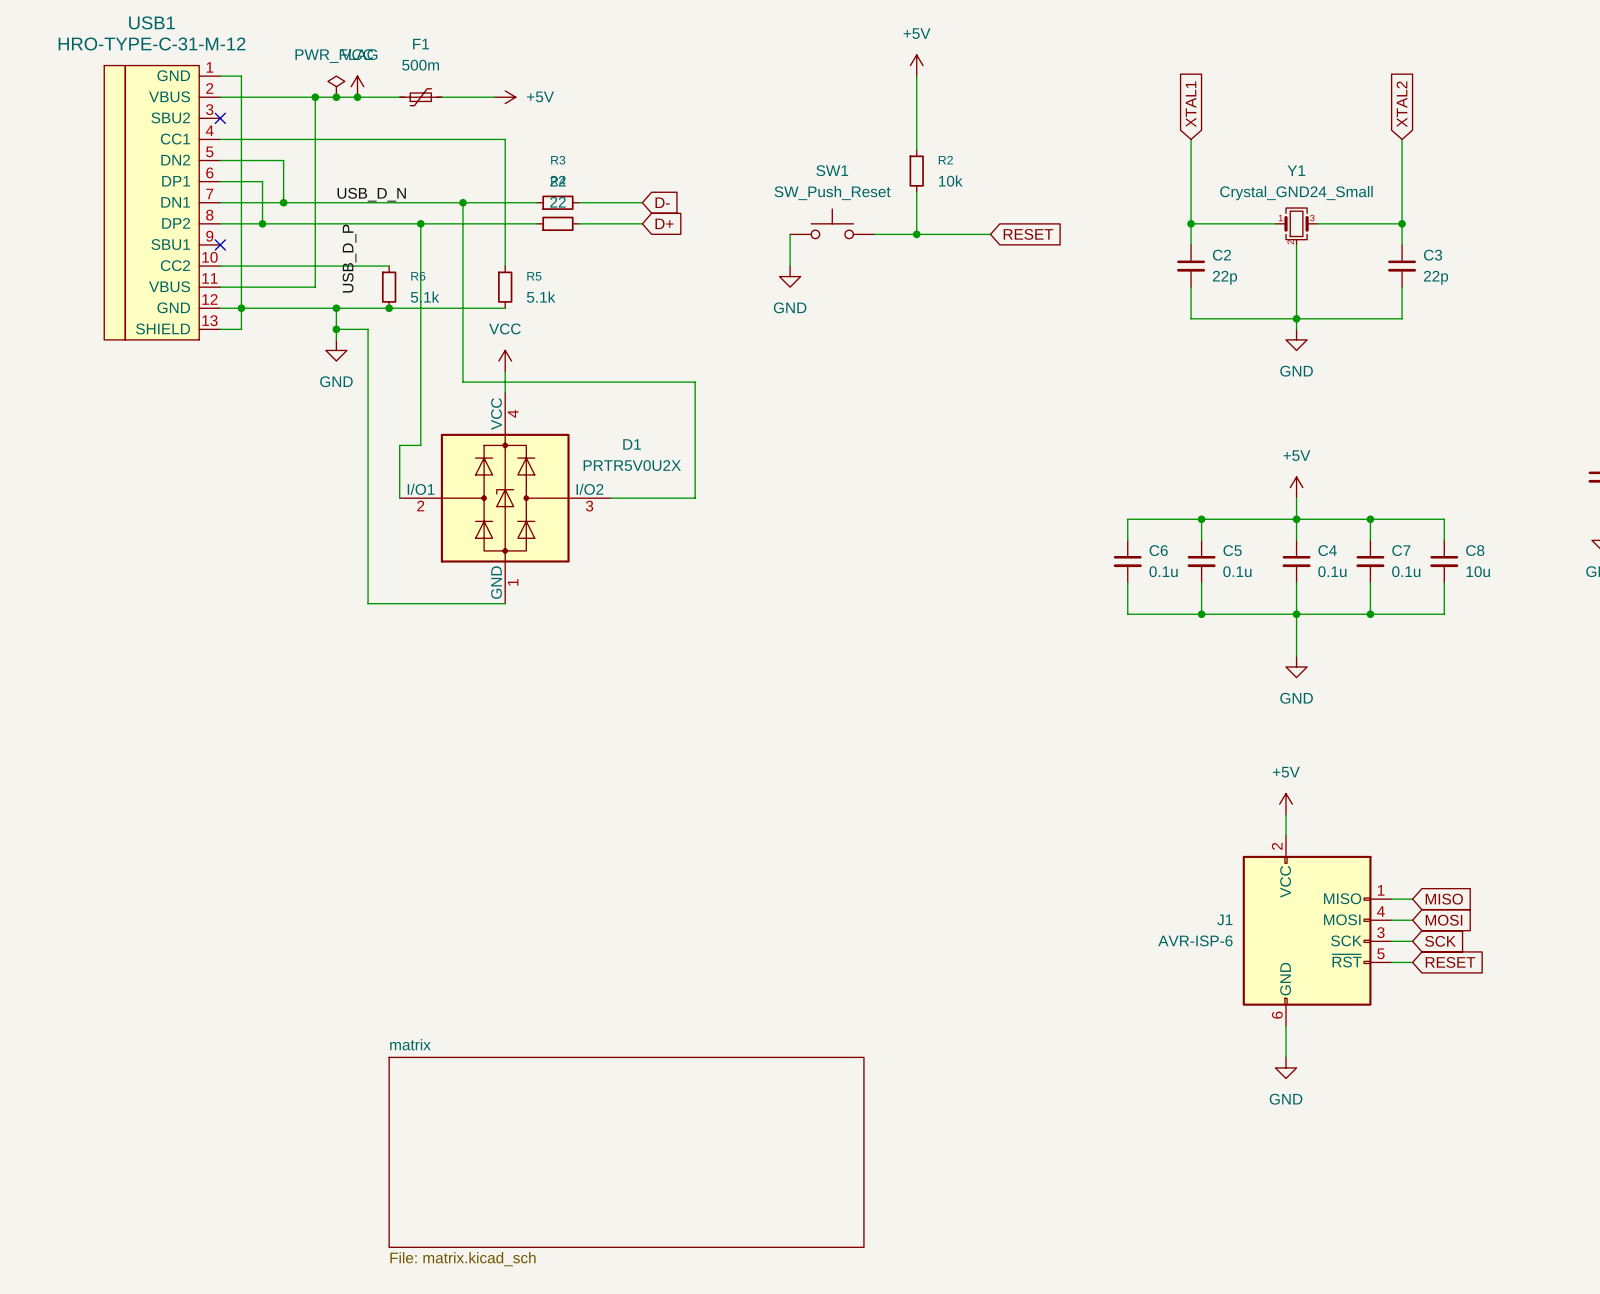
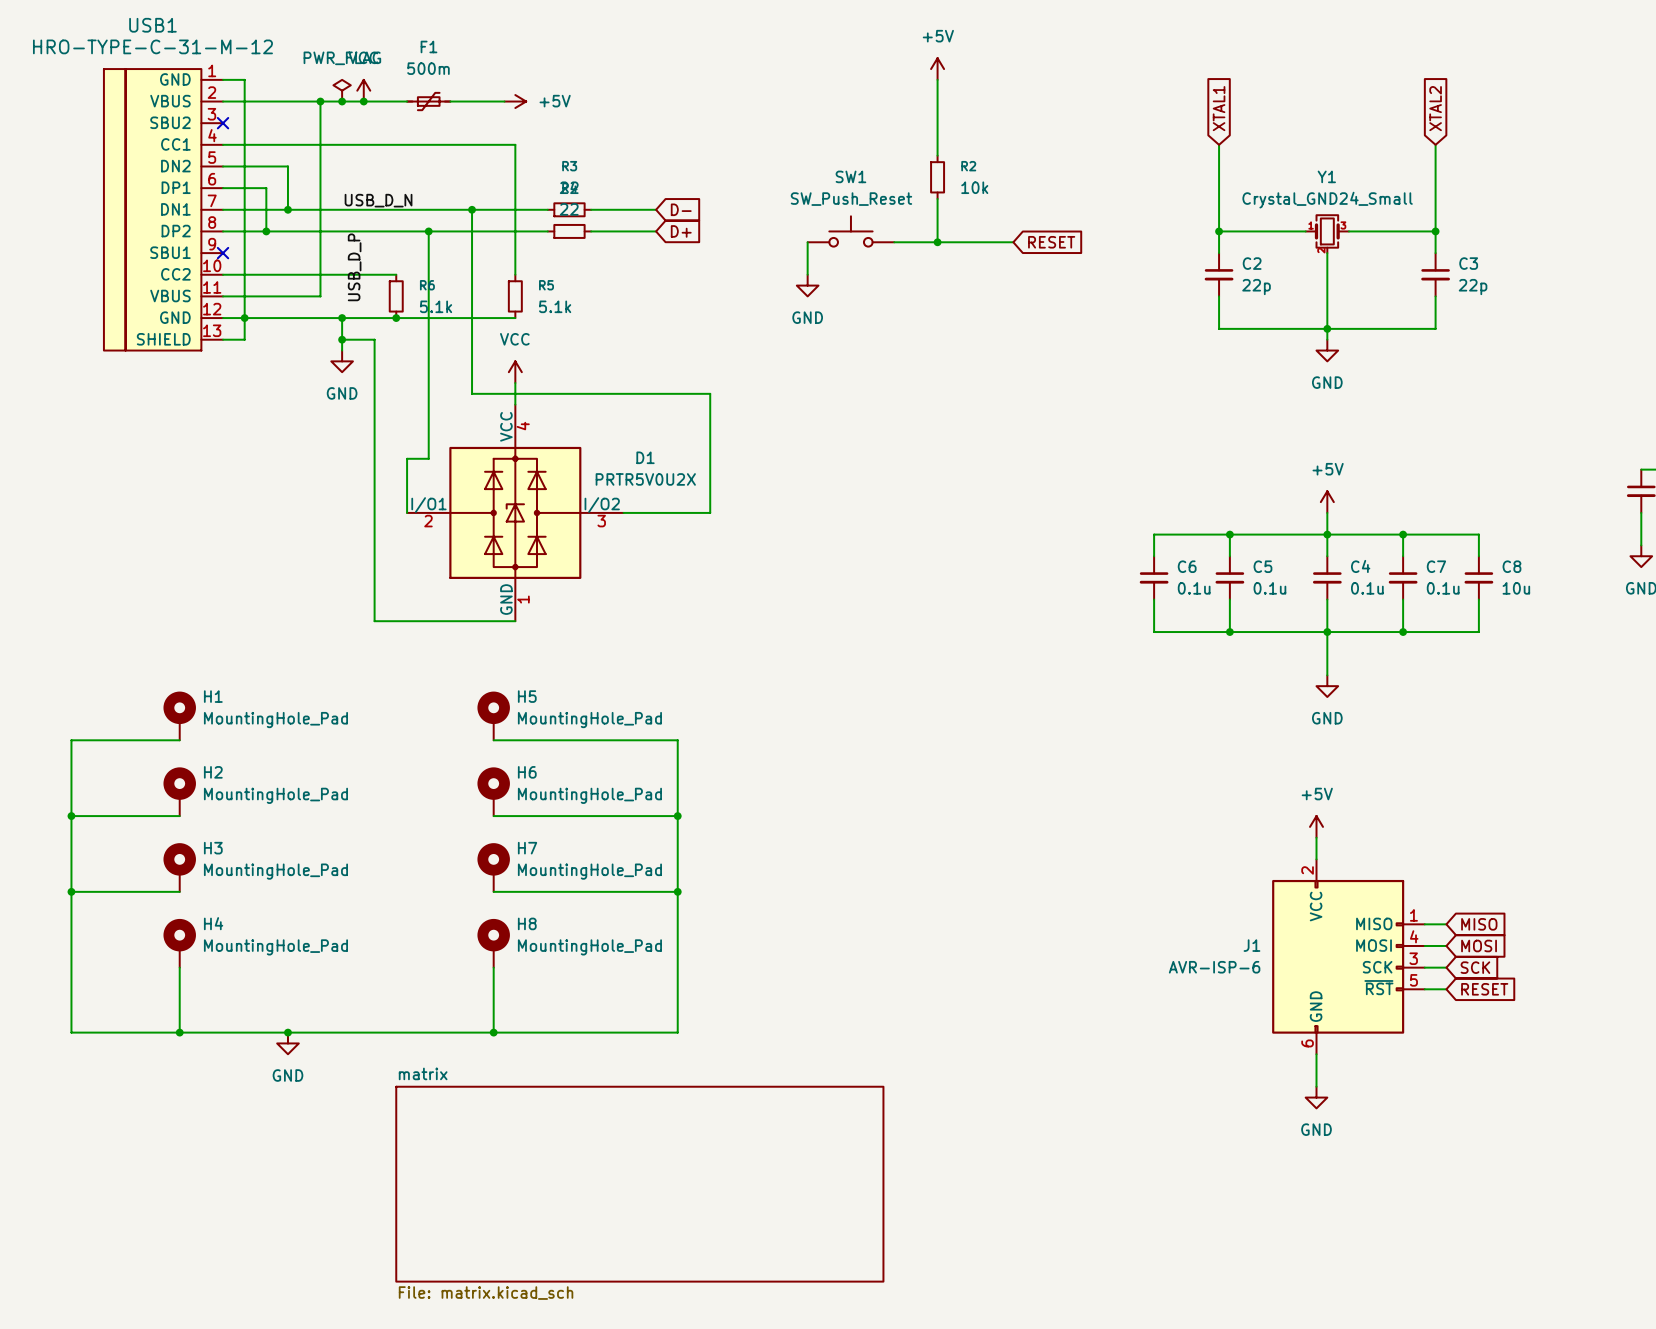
H1: none -> MountingHole_Pad (179, 715)
H5: none -> MountingHole_Pad (493, 715)
wire: none -> (179, 740) (71, 740) (71, 1032) (677, 1032) (677, 740) (493, 740)
H2: none -> MountingHole_Pad (179, 791)
H6: none -> MountingHole_Pad (493, 791)
wire: none -> (71, 816) (179, 816)
junction: none -> (71, 816)
wire: none -> (493, 816) (677, 816)
junction: none -> (677, 816)
H3: none -> MountingHole_Pad (179, 867)
H7: none -> MountingHole_Pad (493, 867)
wire: none -> (71, 891) (179, 891)
junction: none -> (71, 891)
wire: none -> (493, 891) (677, 891)
junction: none -> (677, 891)
H4: none -> MountingHole_Pad (179, 943)
H8: none -> MountingHole_Pad (493, 943)
wire: none -> (179, 967) (179, 1032)
wire: none -> (493, 967) (493, 1032)
junction: none -> (179, 1032)
junction: none -> (287, 1032)
junction: none -> (493, 1032)
power symbol: none -> GND (287, 1043)

